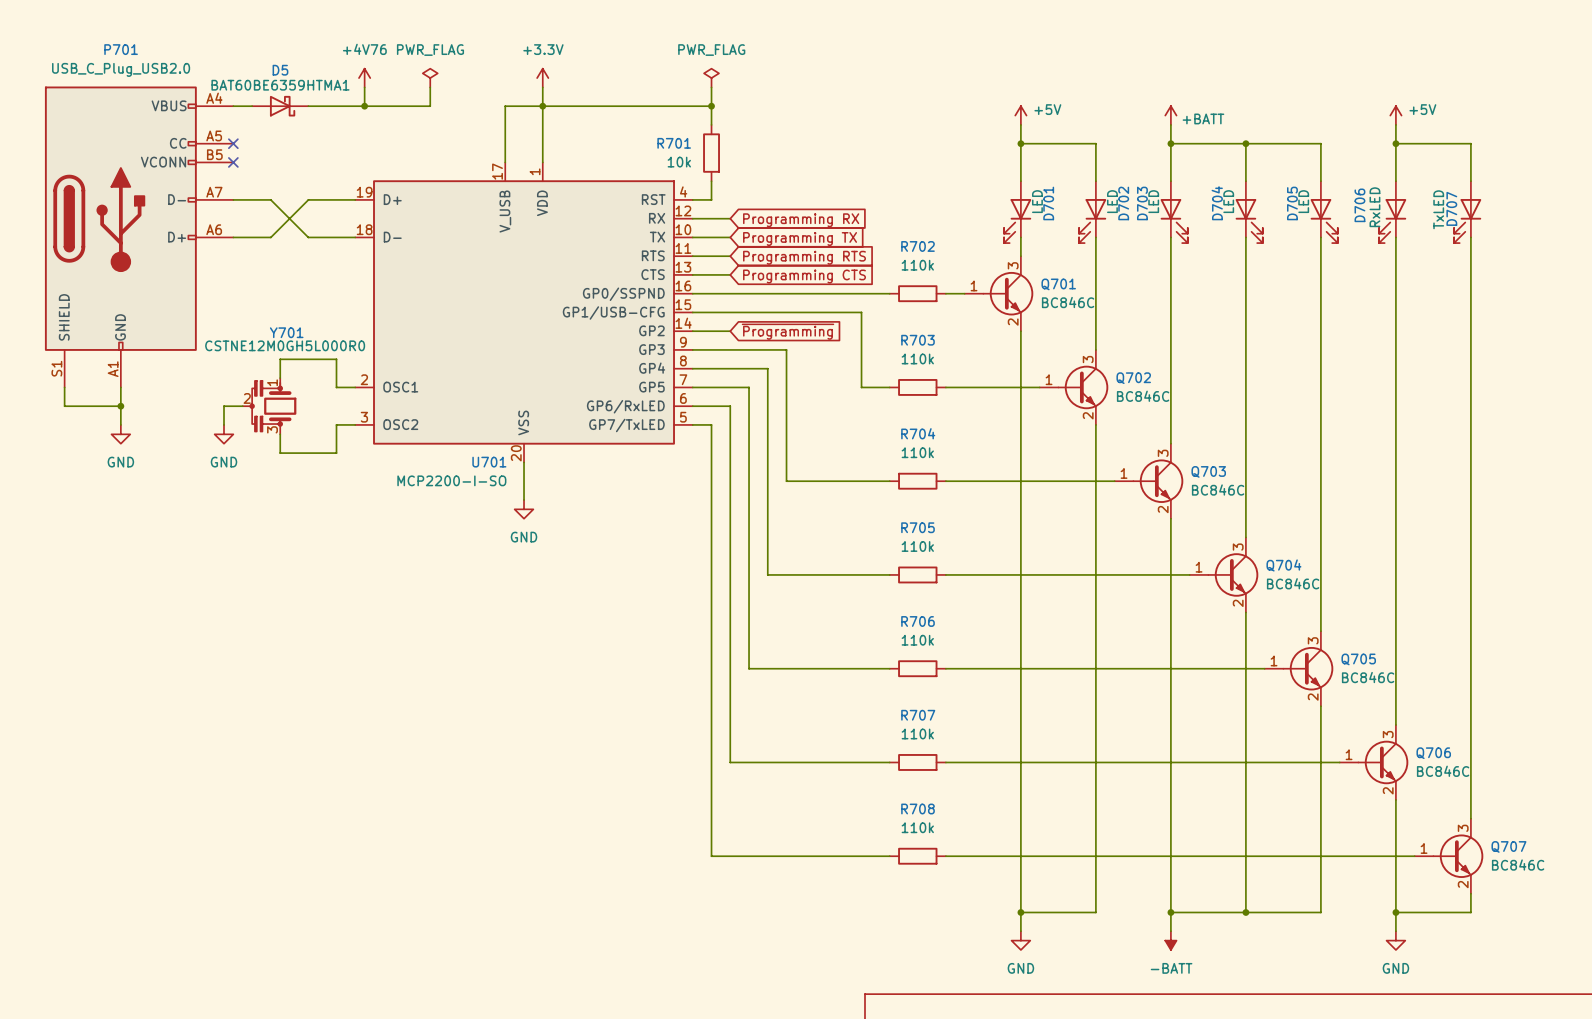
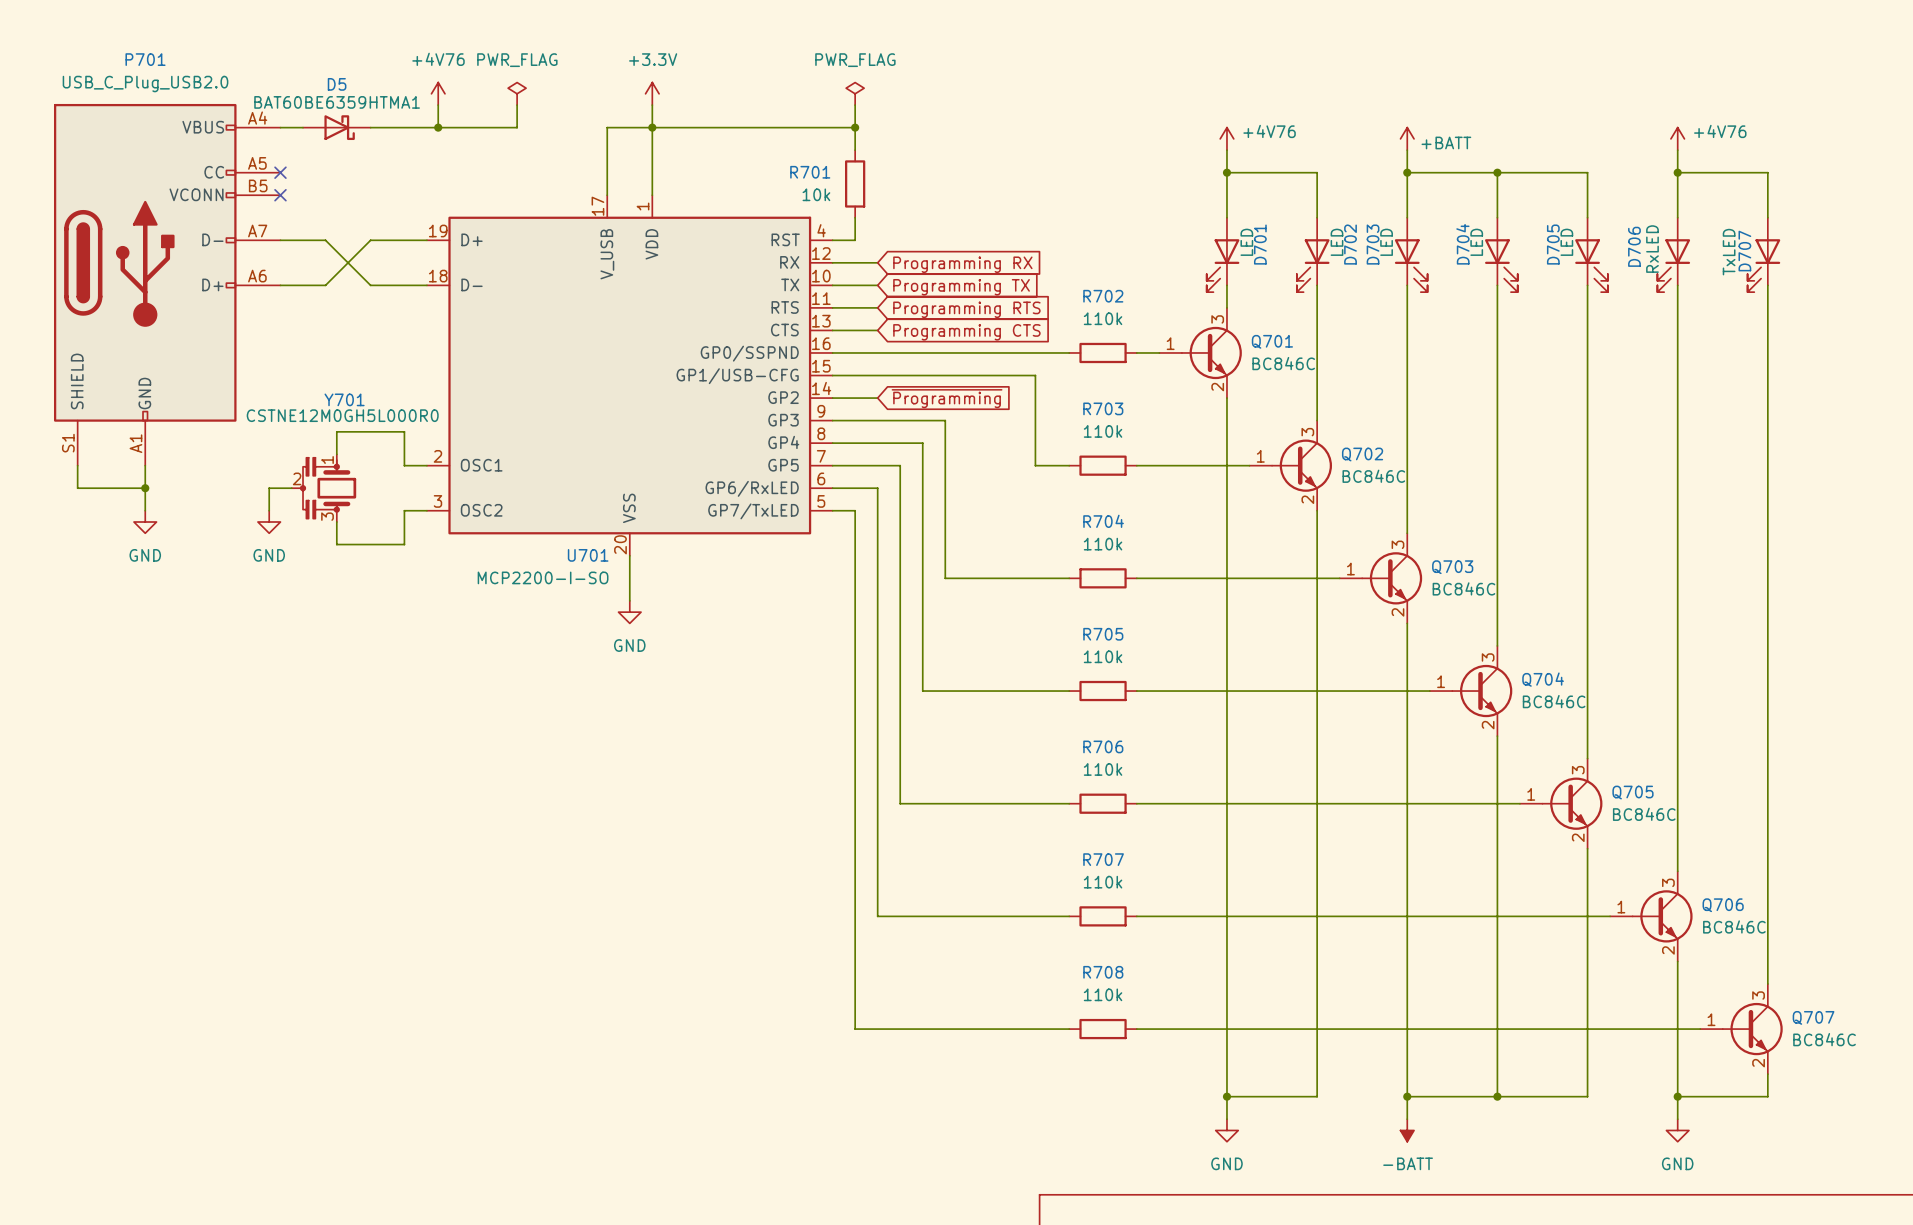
power symbol: +5V (1020, 115) -> +4V76 (1226, 138)
power symbol: +5V (1395, 115) -> +4V76 (1677, 138)

